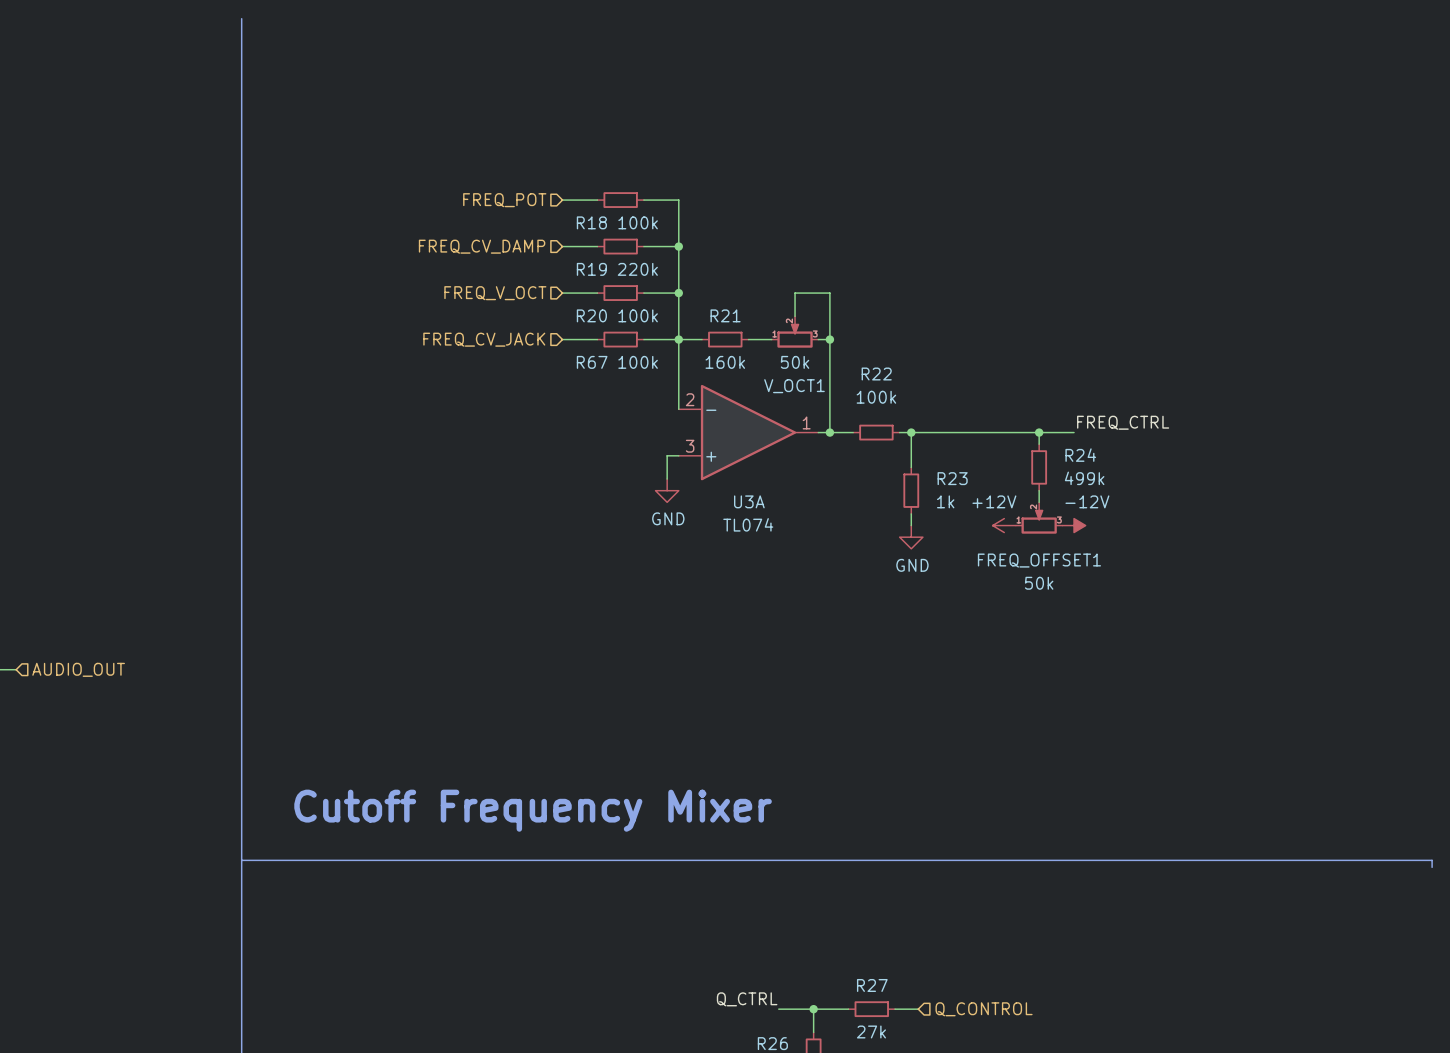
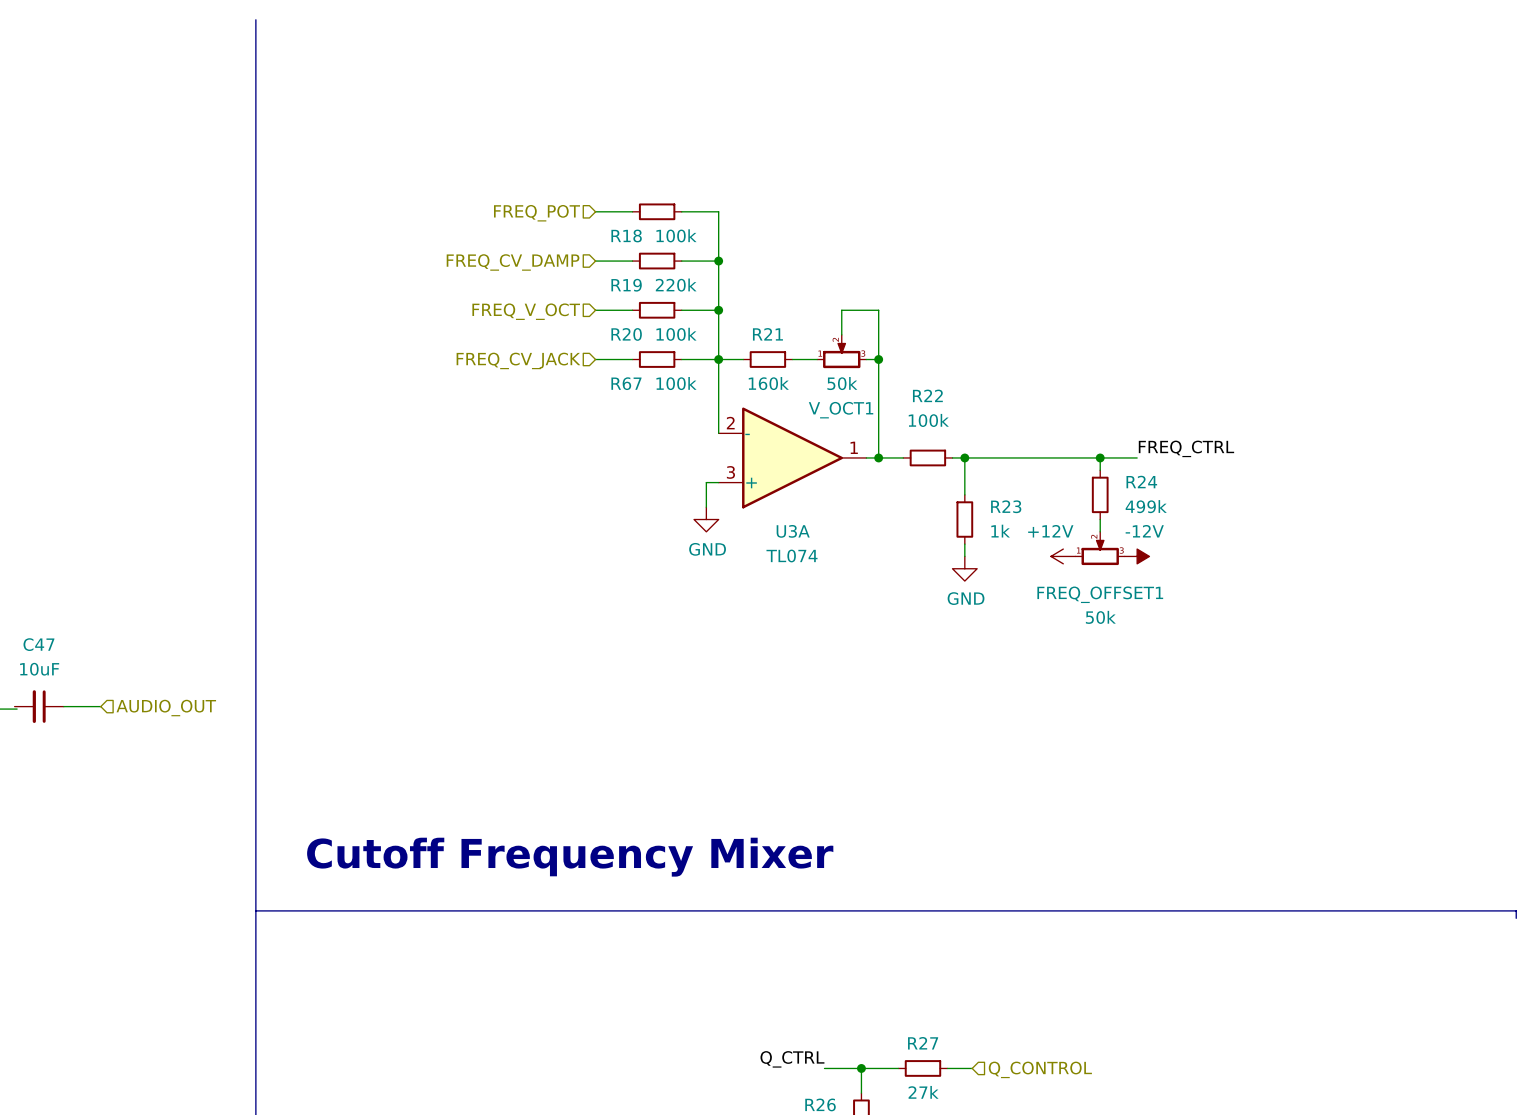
C47: none -> 10uF (39, 706)
wire: none -> (63, 706) (100, 706)
hierarchical label position: AUDIO_OUT (78, 669) -> AUDIO_OUT (166, 708)

